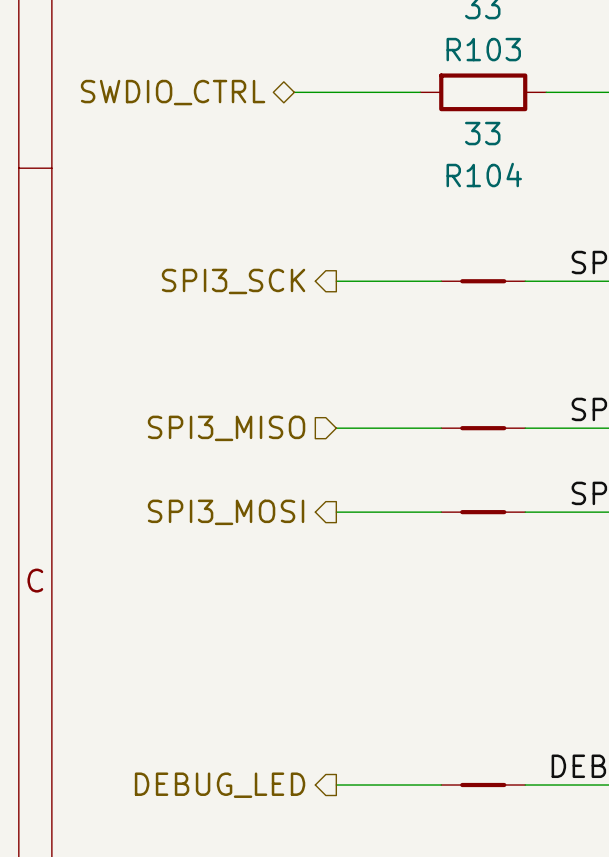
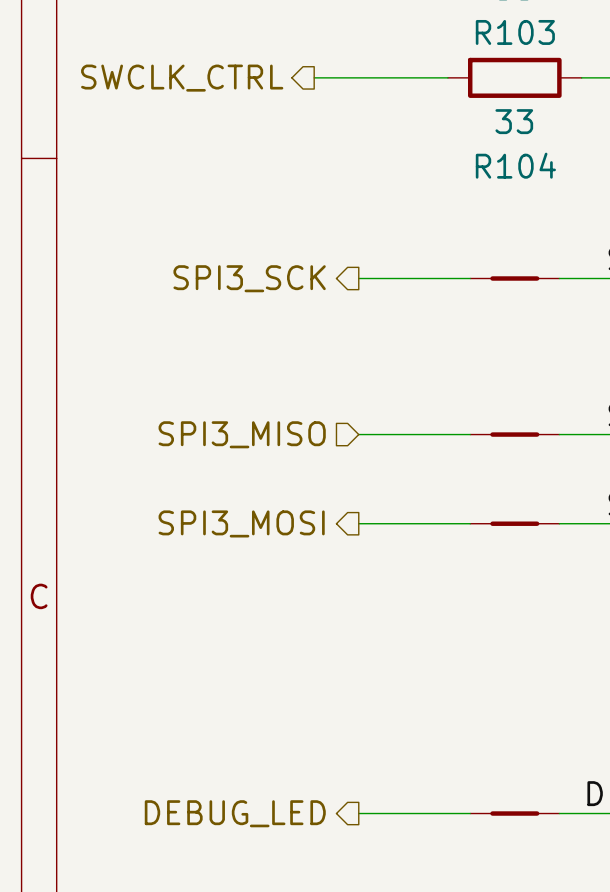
hierarchical label shape: bidirectional (173, 92) -> output (182, 78)
hierarchical label: SWDIO_CTRL (173, 92) -> SWCLK_CTRL (182, 78)

